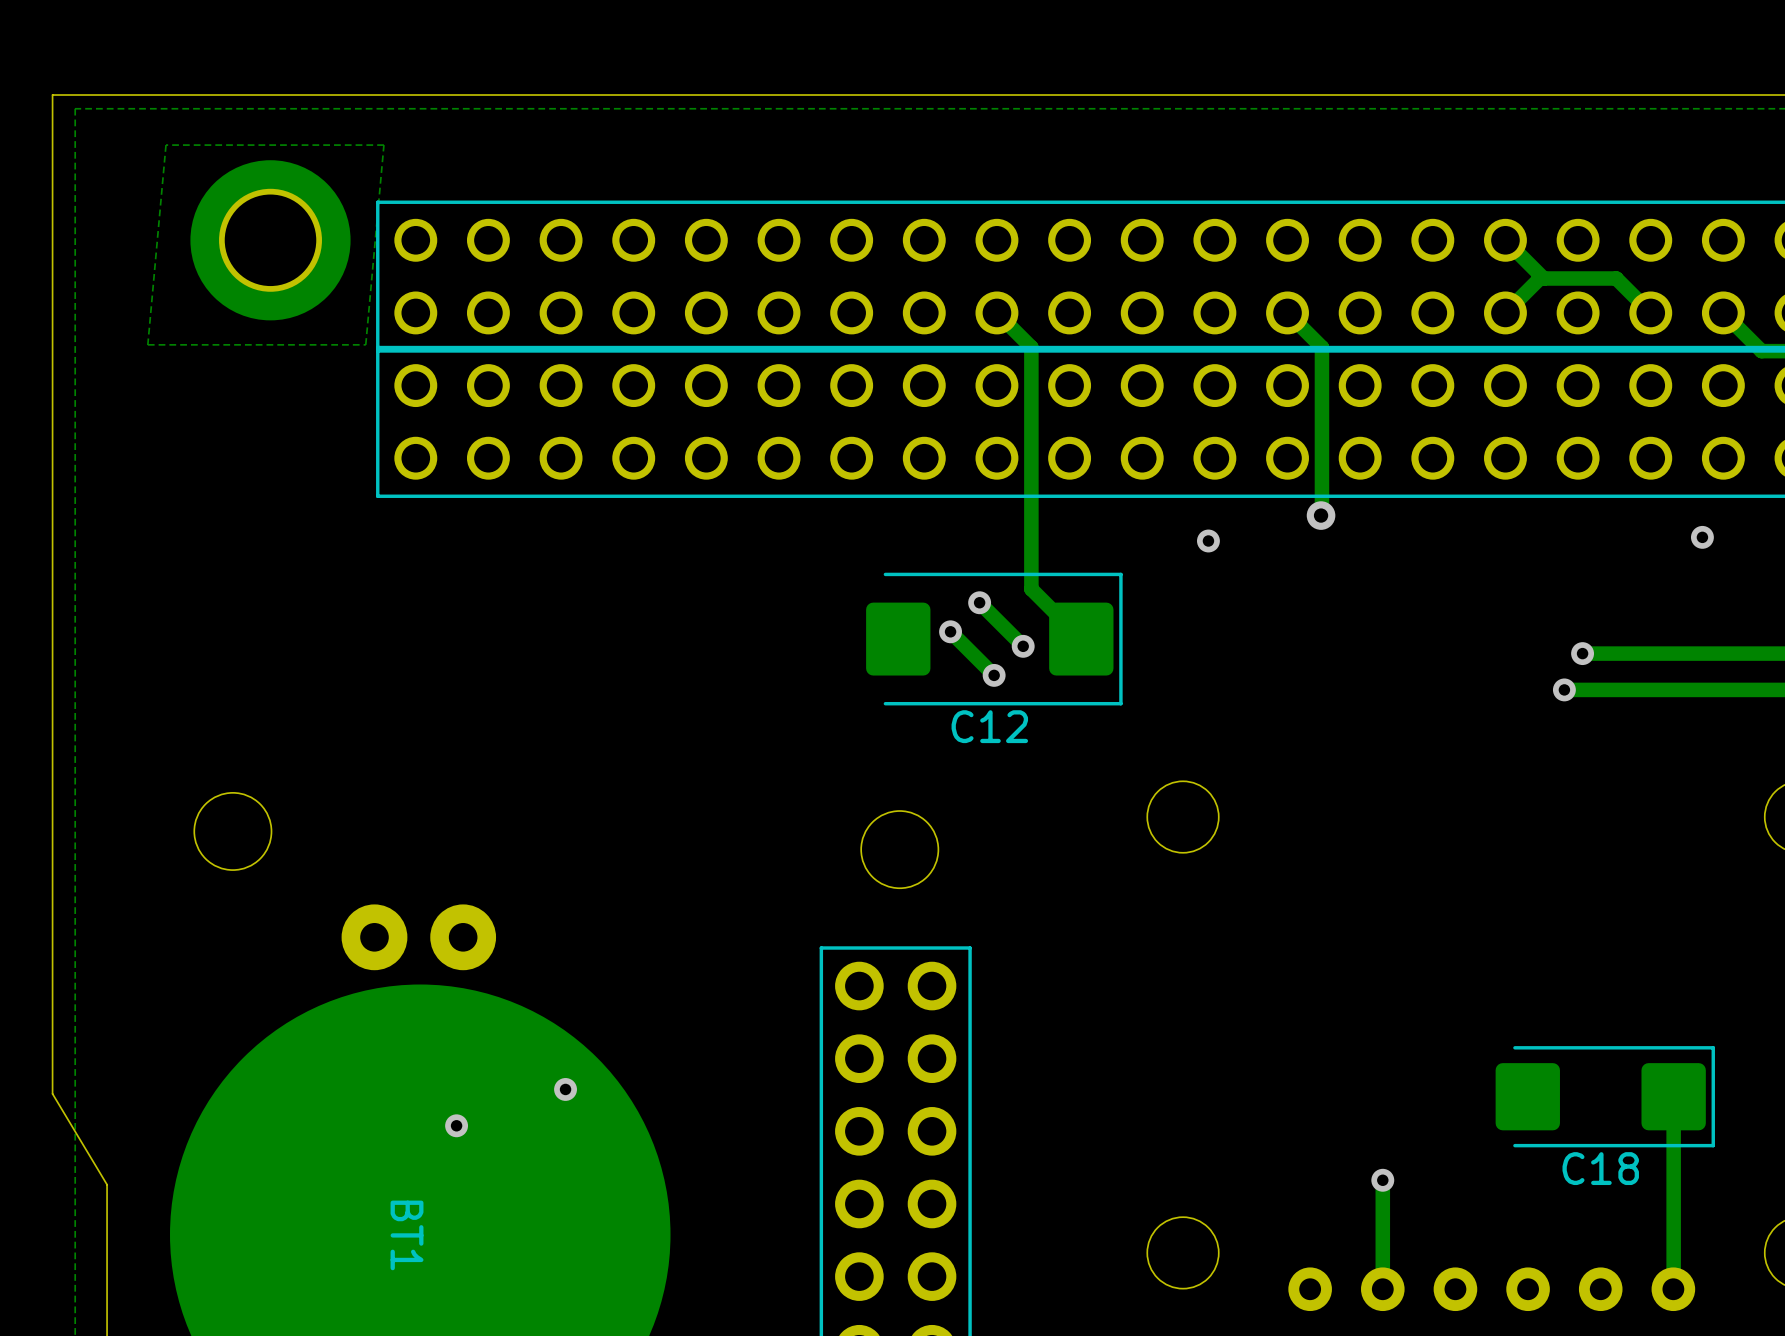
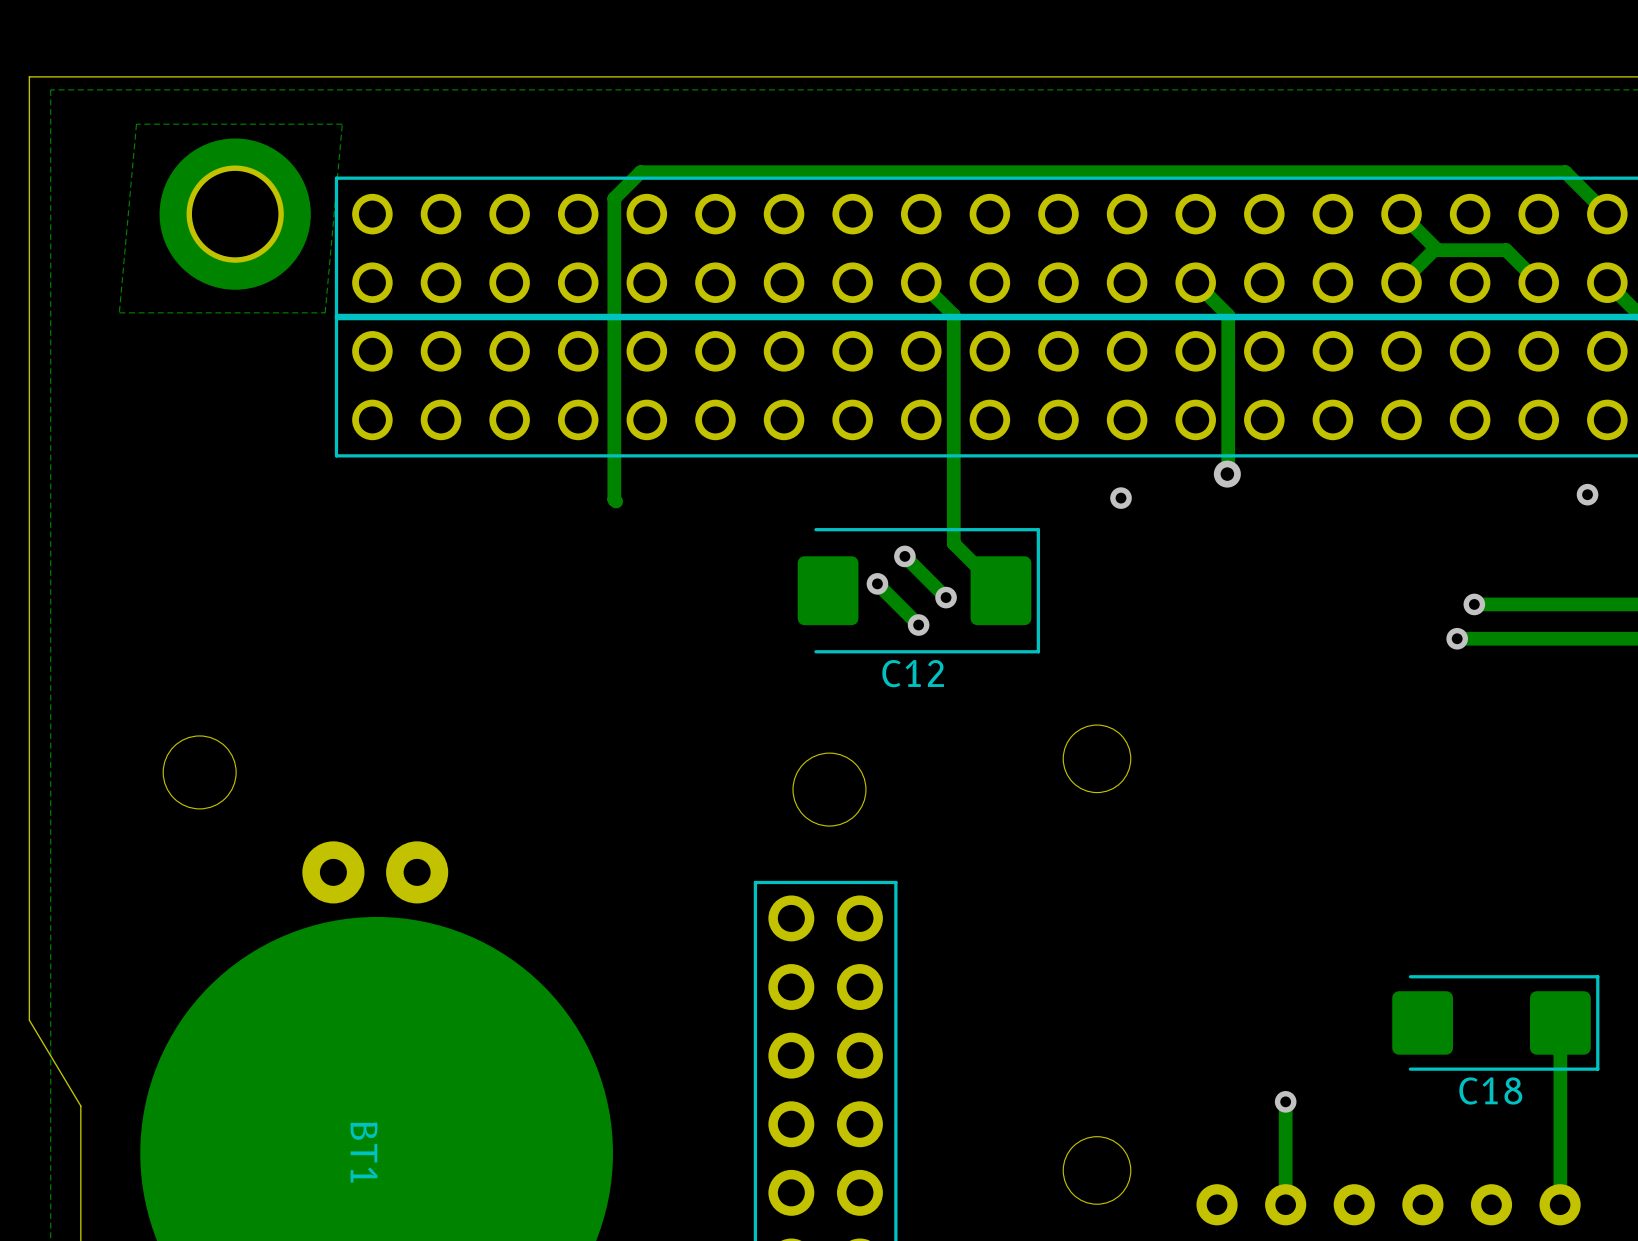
track: none -> (1607, 214) (1565, 172) (640, 172) (614, 198) (614, 499) (616, 501)
via: (565, 1089) -> none
via: (456, 1125) -> none

